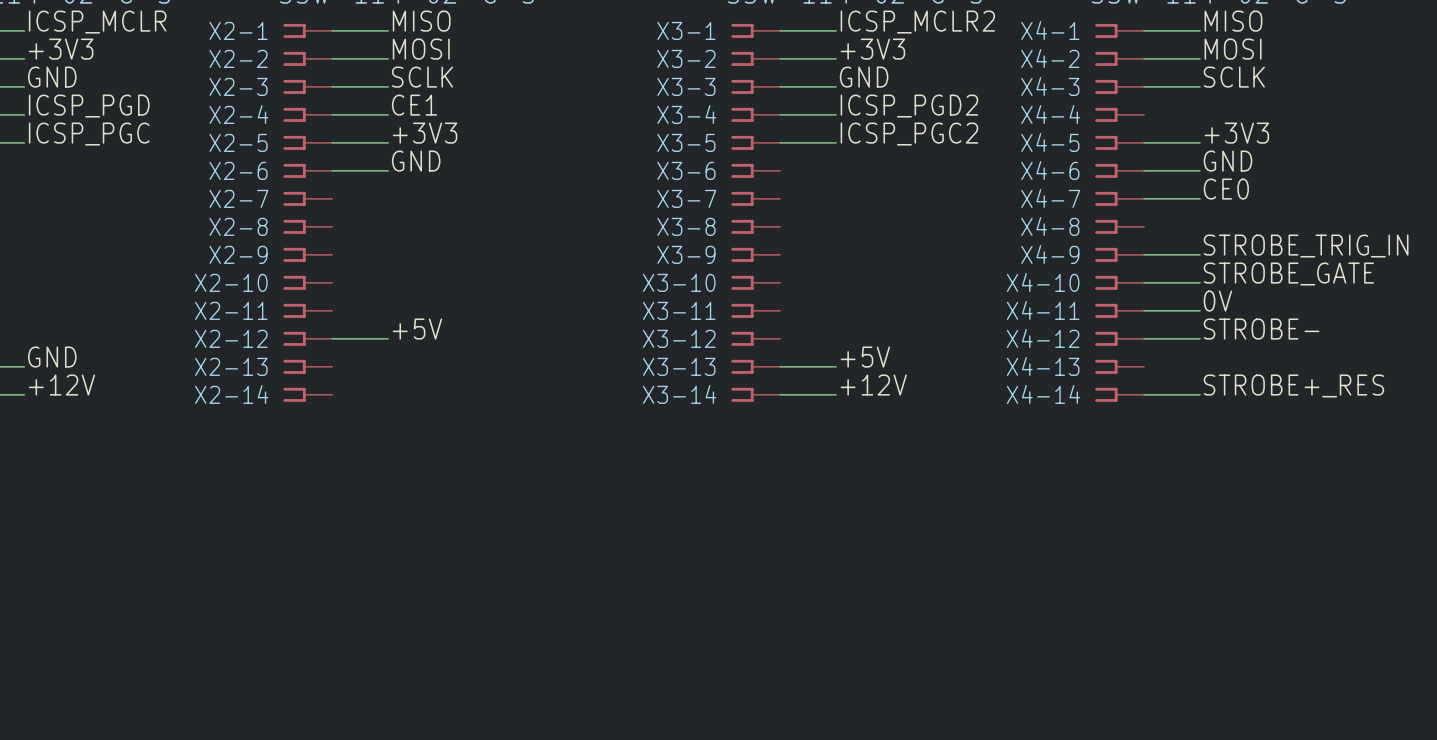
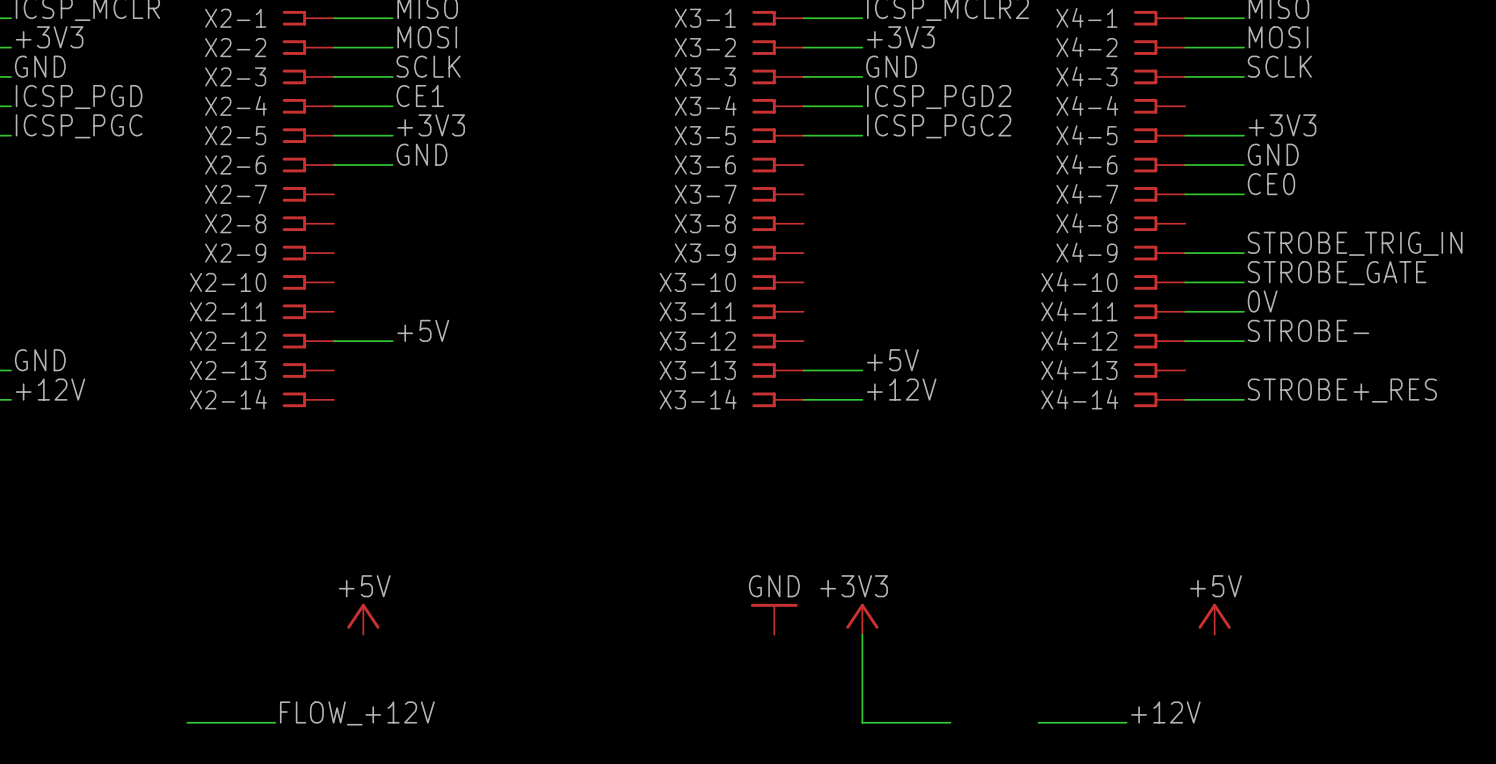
power symbol: none -> +5V (363, 619)
power symbol: none -> GND (774, 619)
power symbol: none -> +3V3 (862, 619)
power symbol: none -> +5V (1214, 619)
wire: none -> (862, 634) (862, 722) (950, 722)
label: none -> +12V (1165, 712)
label: none -> FLOW_+12V (357, 713)
wire: none -> (187, 722) (275, 722)
wire: none -> (1038, 722) (1126, 722)

